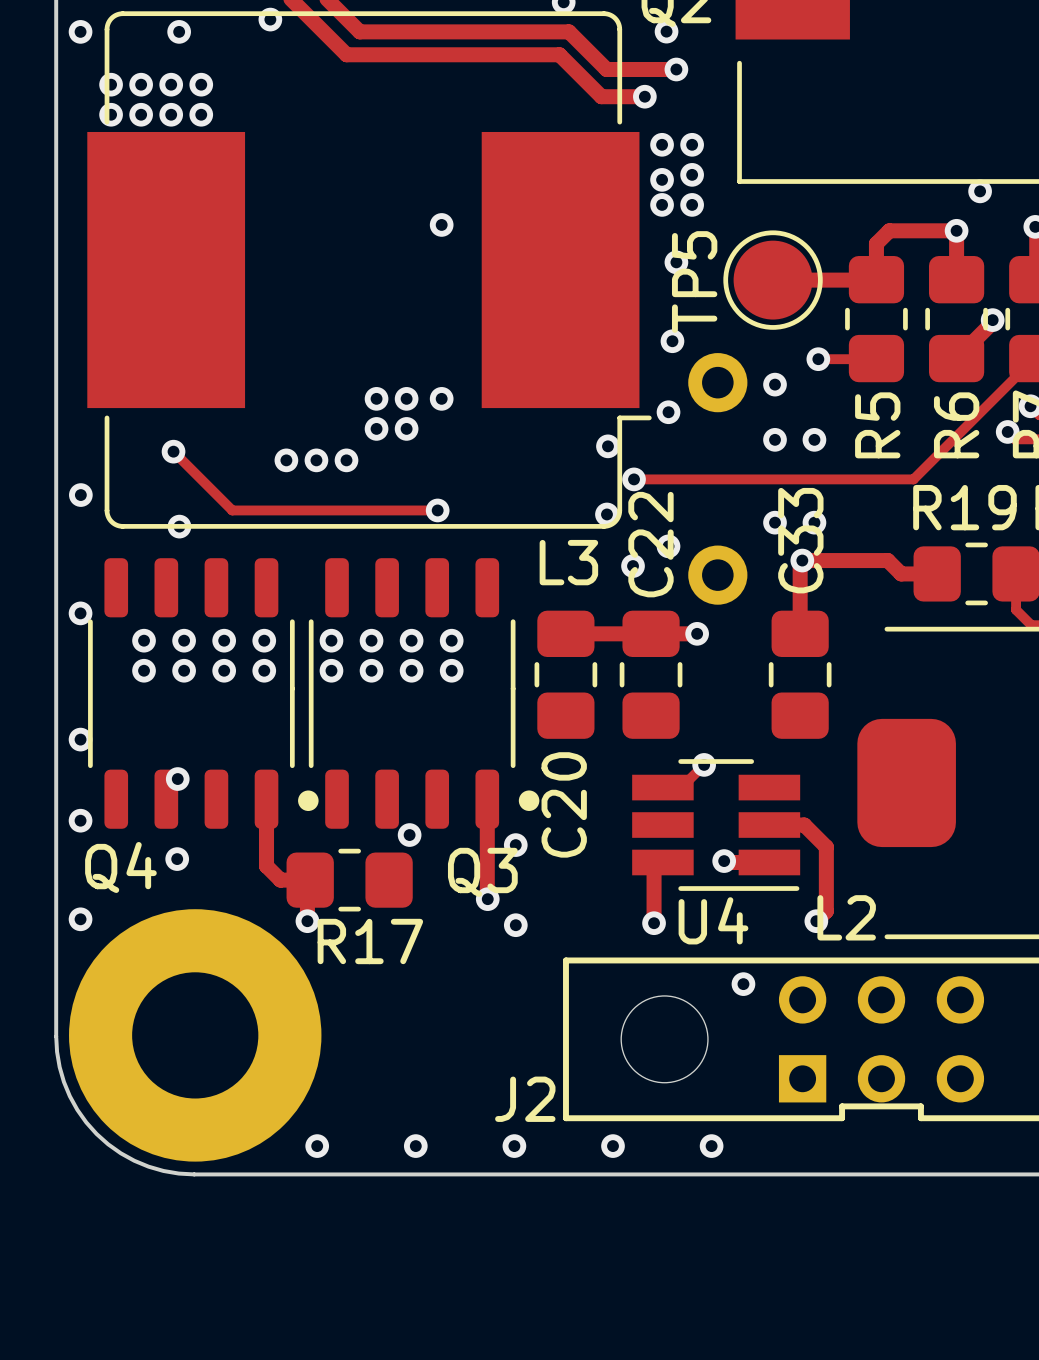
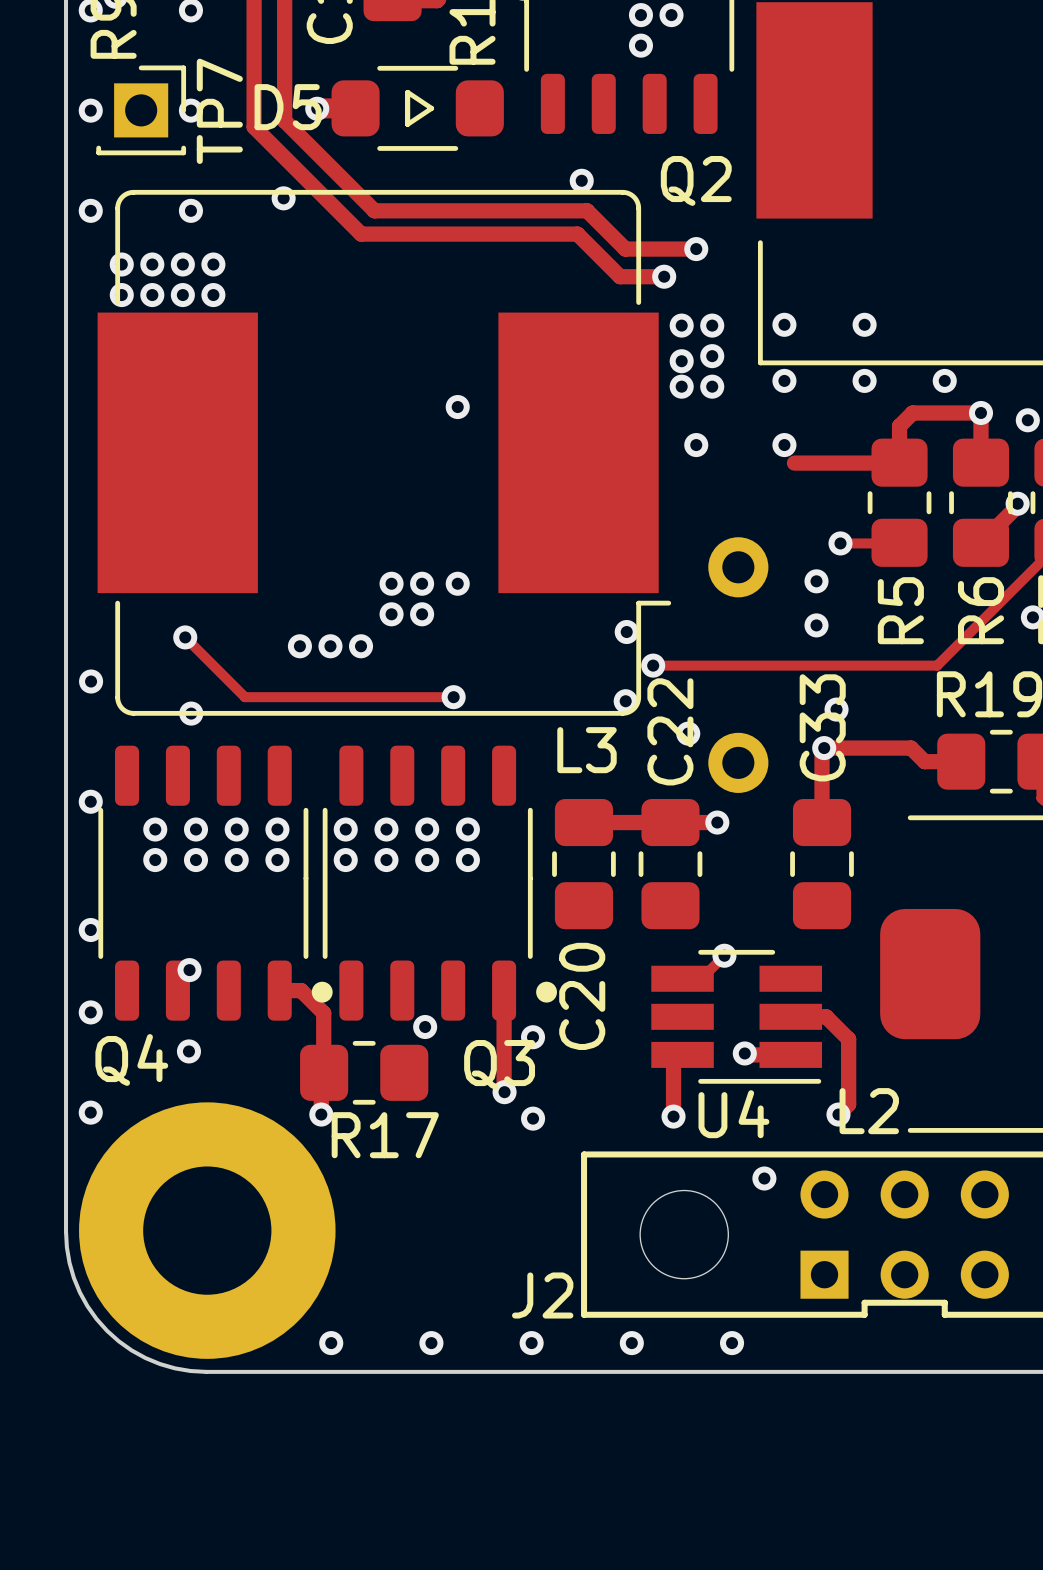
via: (666, 31) -> none
via: none -> (784, 324)
via: none -> (864, 324)
via: (980, 191) -> none
via: none -> (784, 380)
via: none -> (864, 380)
via: none -> (944, 380)
via: none -> (1027, 420)
via: none -> (784, 445)
TP5: (773, 280) -> none
via: (672, 341) -> none
via position: (775, 384) -> (816, 581)
via: (668, 412) -> none
via: (775, 439) -> none
via: none -> (816, 625)
via: (814, 439) -> none
via: (775, 522) -> none
via: (633, 566) -> none
track: (266, 799) (266, 866) (280, 880) (310, 880) -> (279, 990) (301, 990) (323, 1013) (323, 1072)

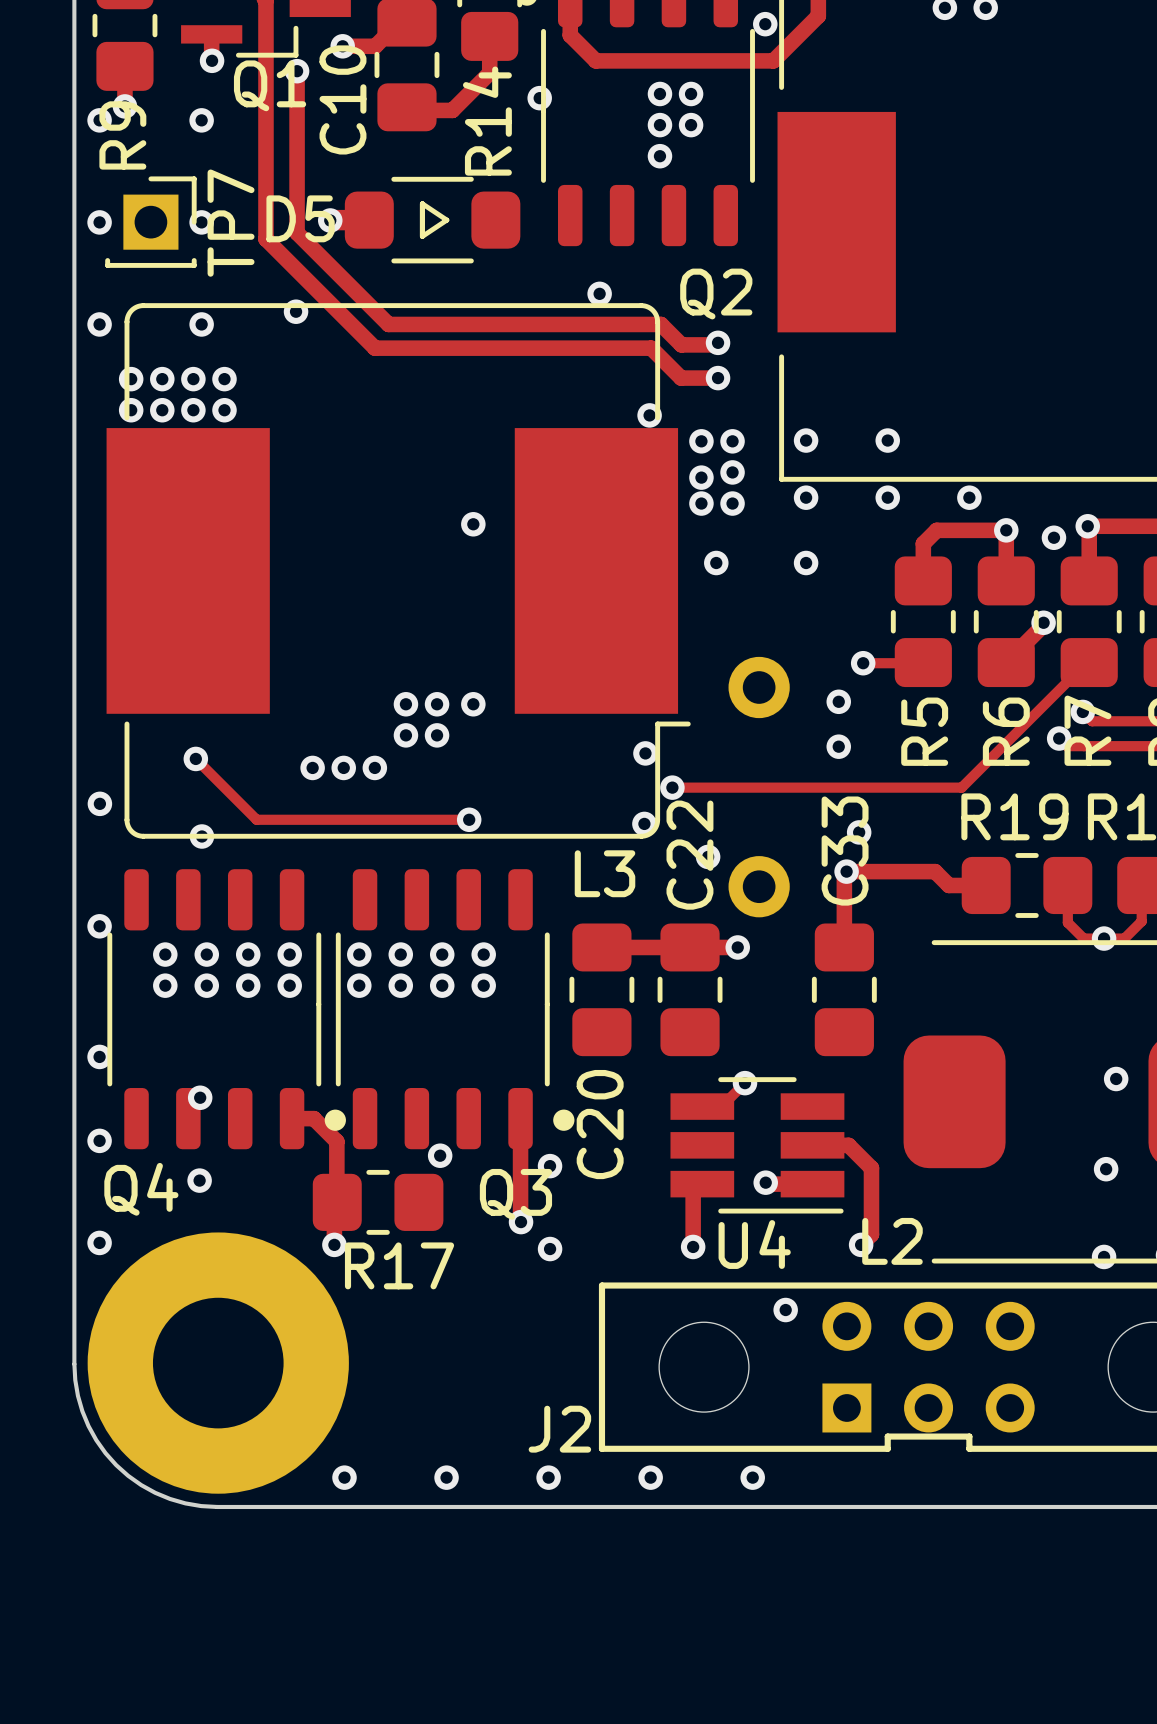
track: (587, 210) (625, 249) (696, 249) -> (605, 324) (661, 324) (681, 344) (715, 344) (718, 342)
via: none -> (718, 342)
track: (577, 234) (620, 276) (664, 276) -> (595, 348) (651, 348) (681, 378) (718, 378)
via: (696, 249) -> none
via: none -> (718, 378)
via: (664, 276) -> none
via: none -> (649, 415)
track: (794, 463) (899, 463) -> none

